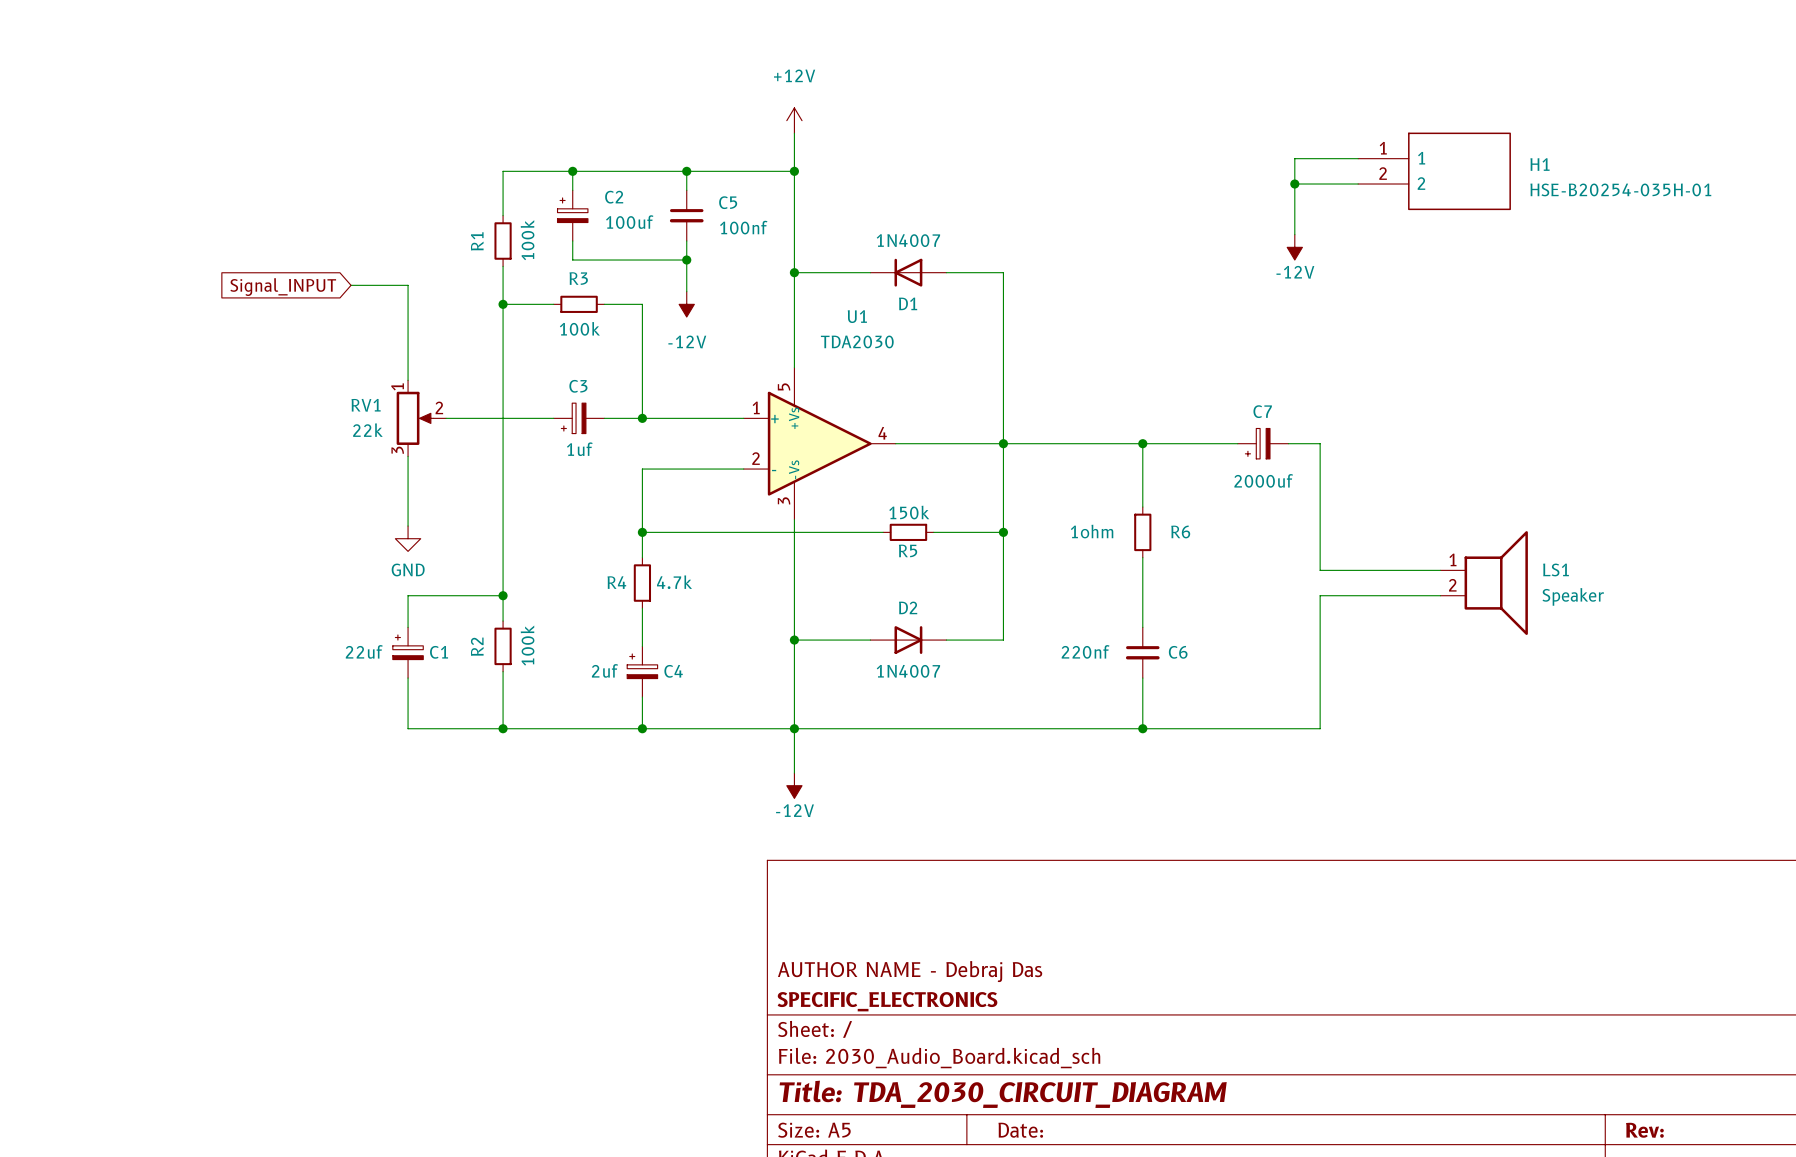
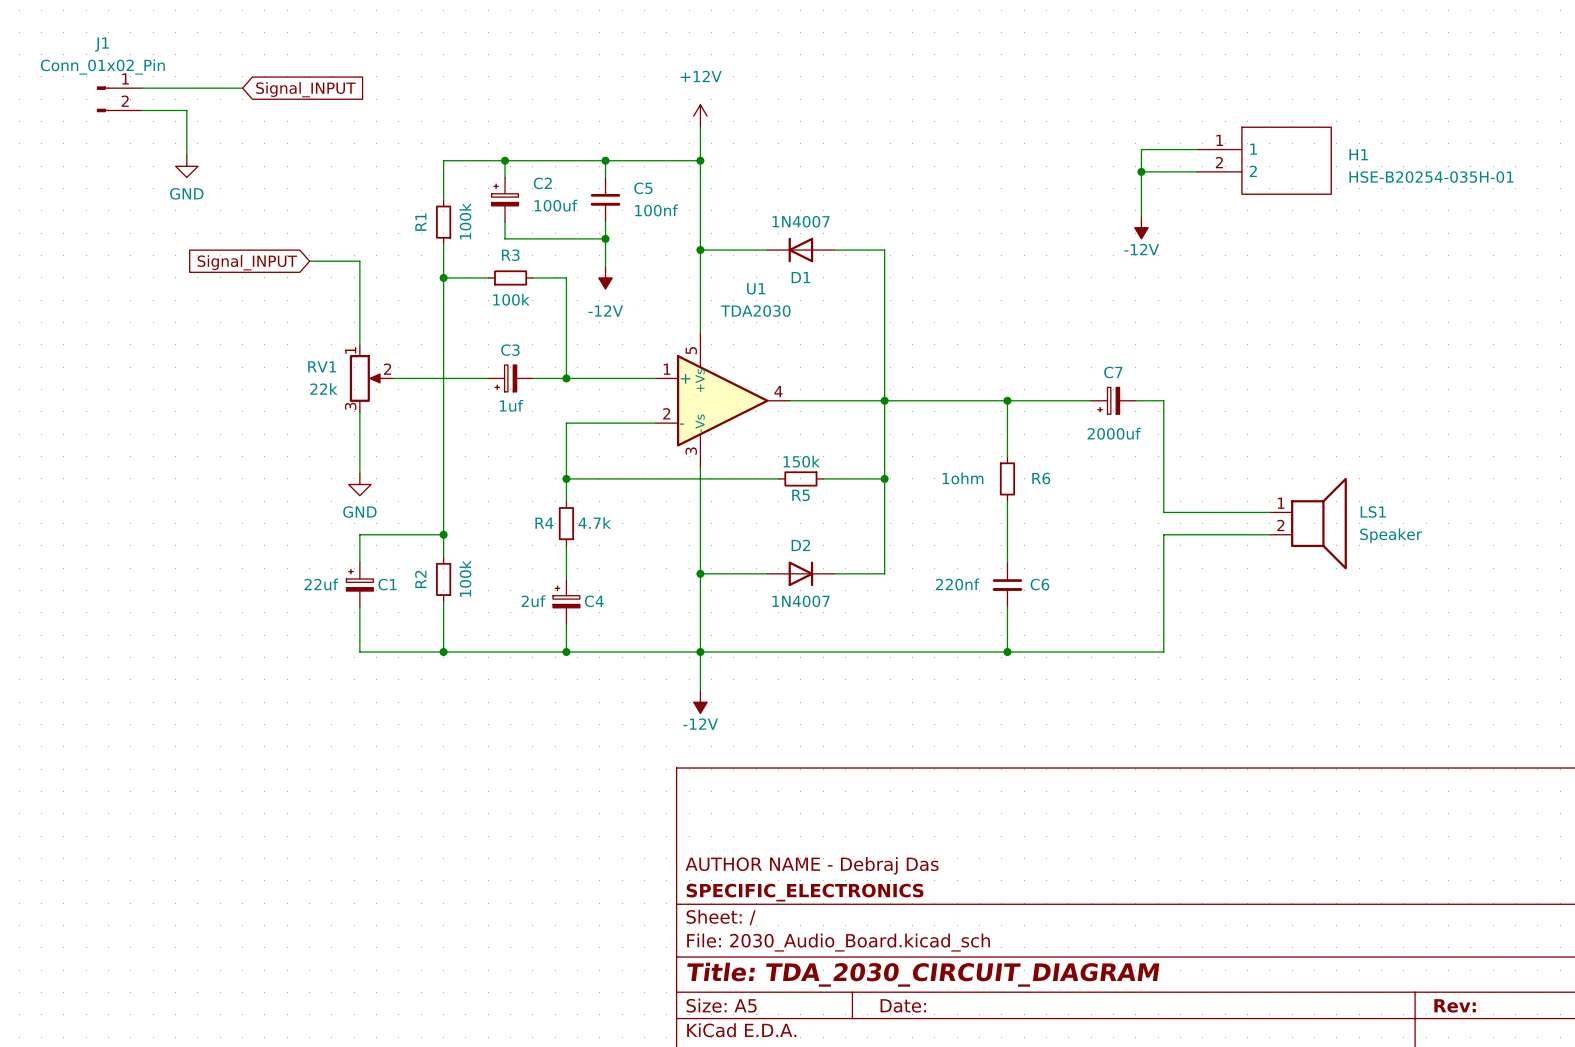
wire: none -> (142, 88) (242, 88)
global label: none -> Signal_INPUT (305, 89)
J1: none -> Conn_01x02_Pin (119, 99)
wire: none -> (142, 110) (186, 110) (186, 155)
power symbol: none -> GND (186, 166)

